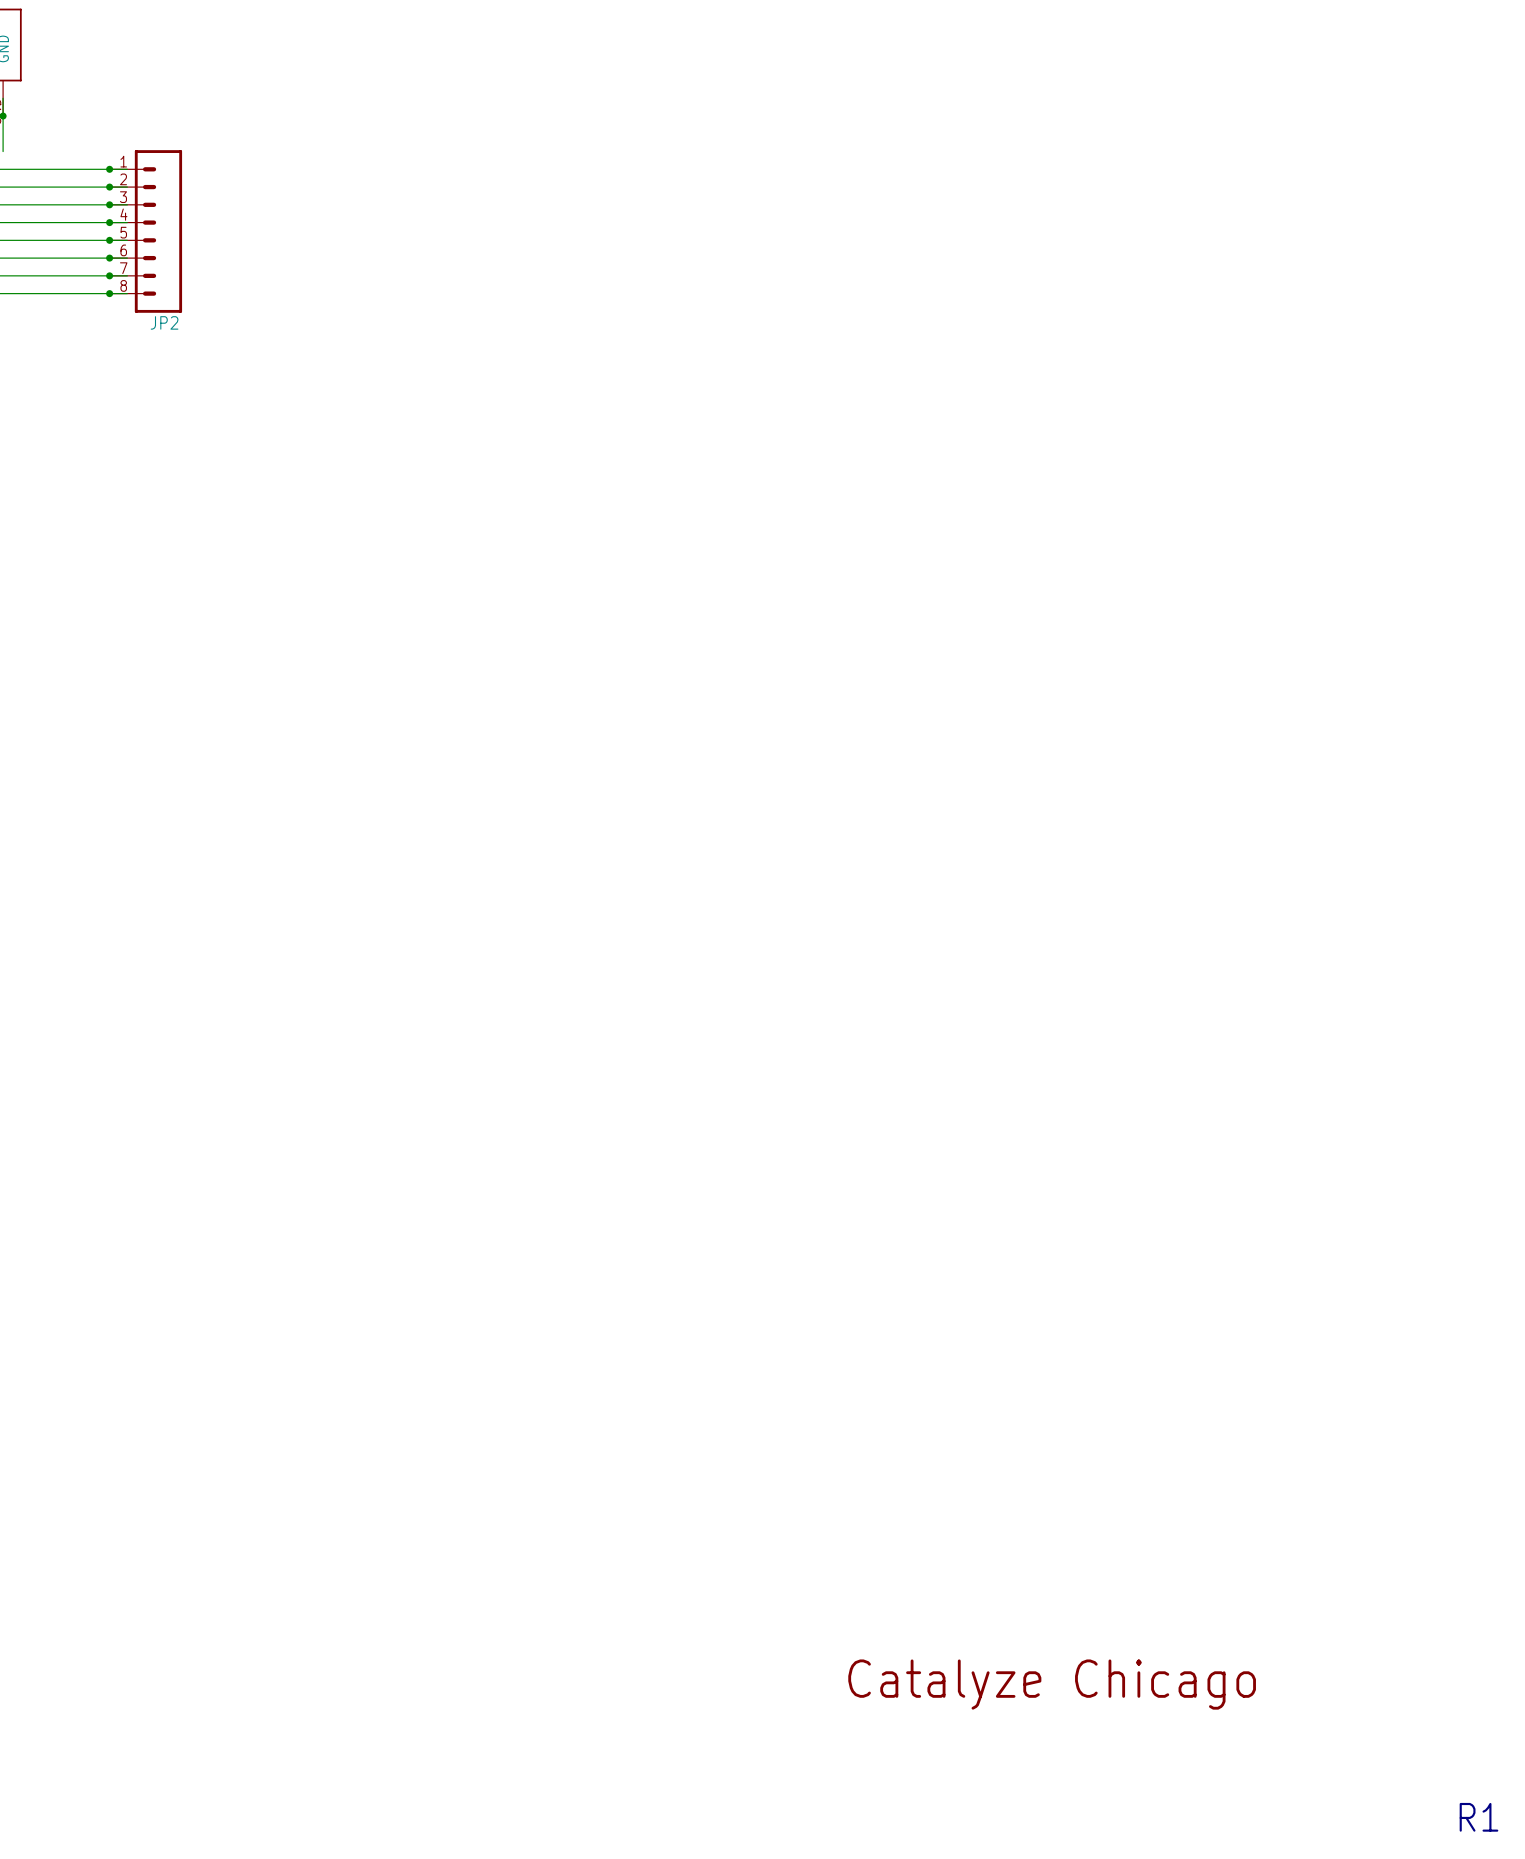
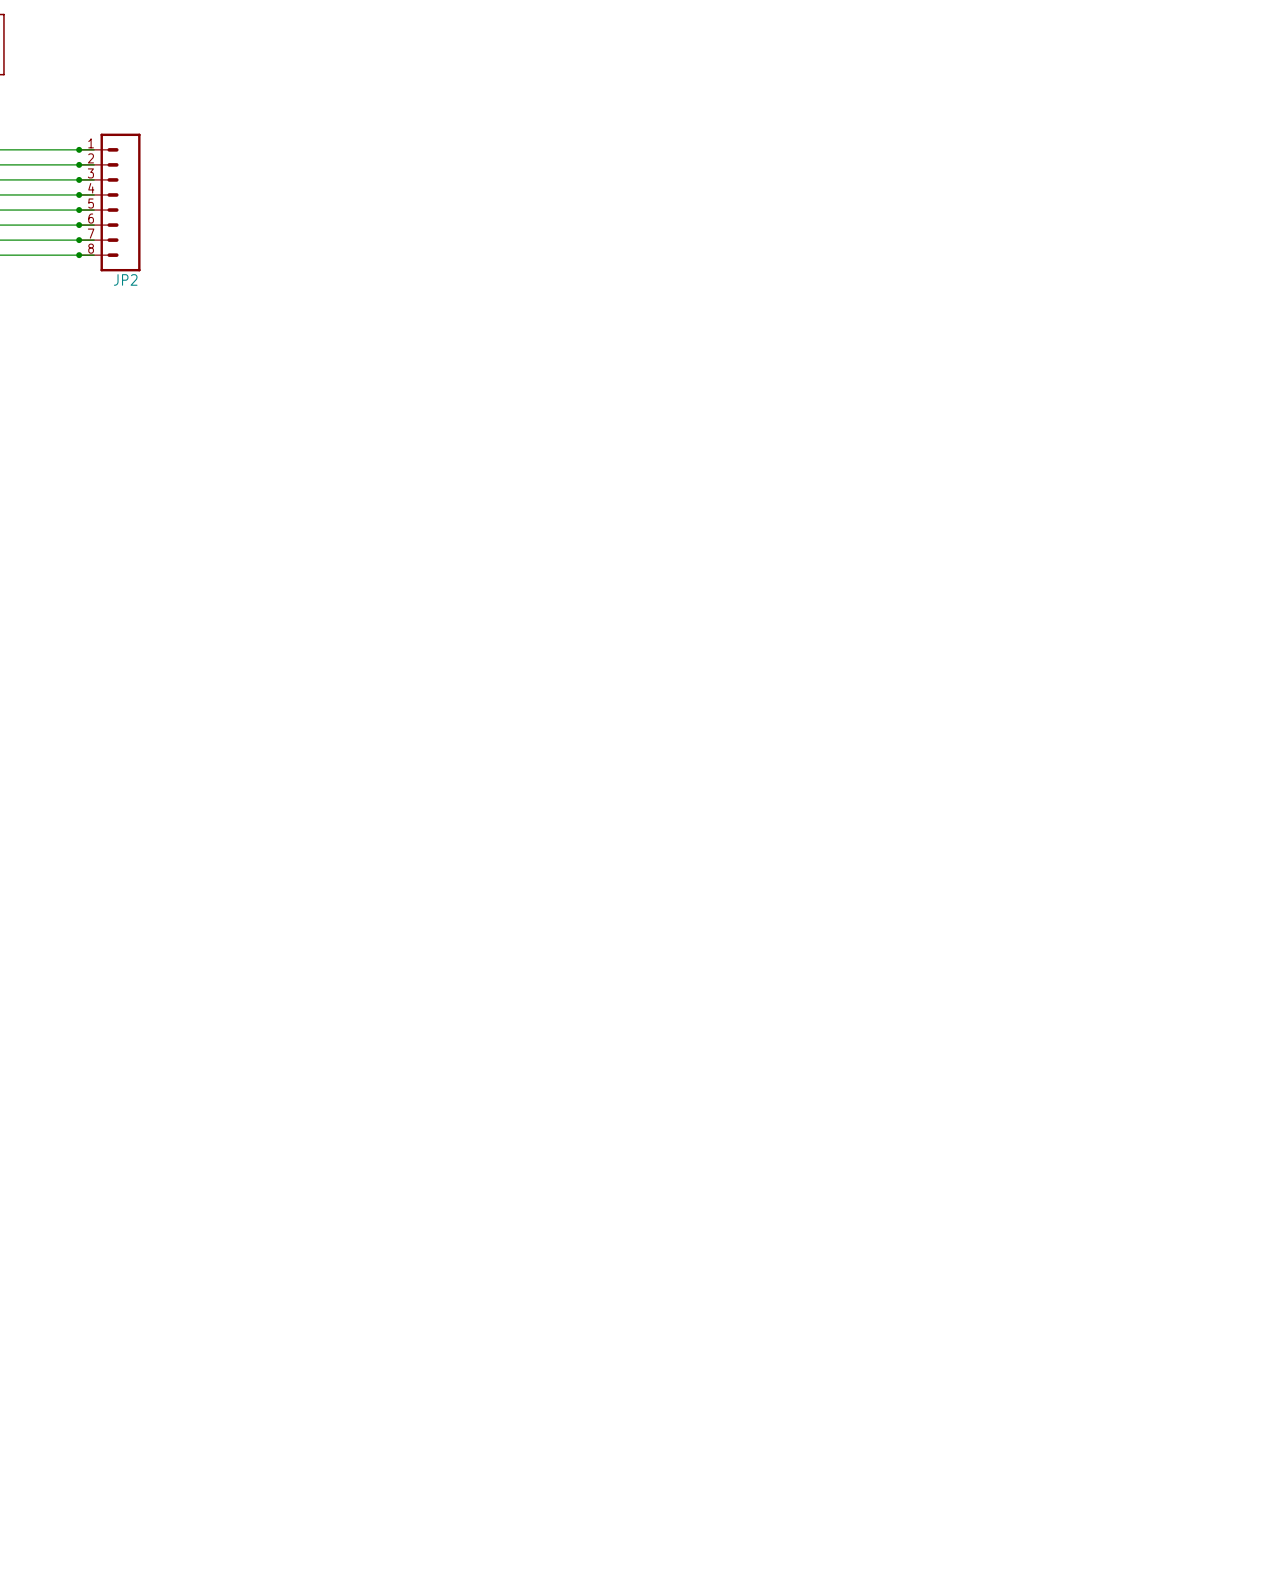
text: Catalyze Chicago (1052, 1684) -> none
text: R1 (1479, 1817) -> none

